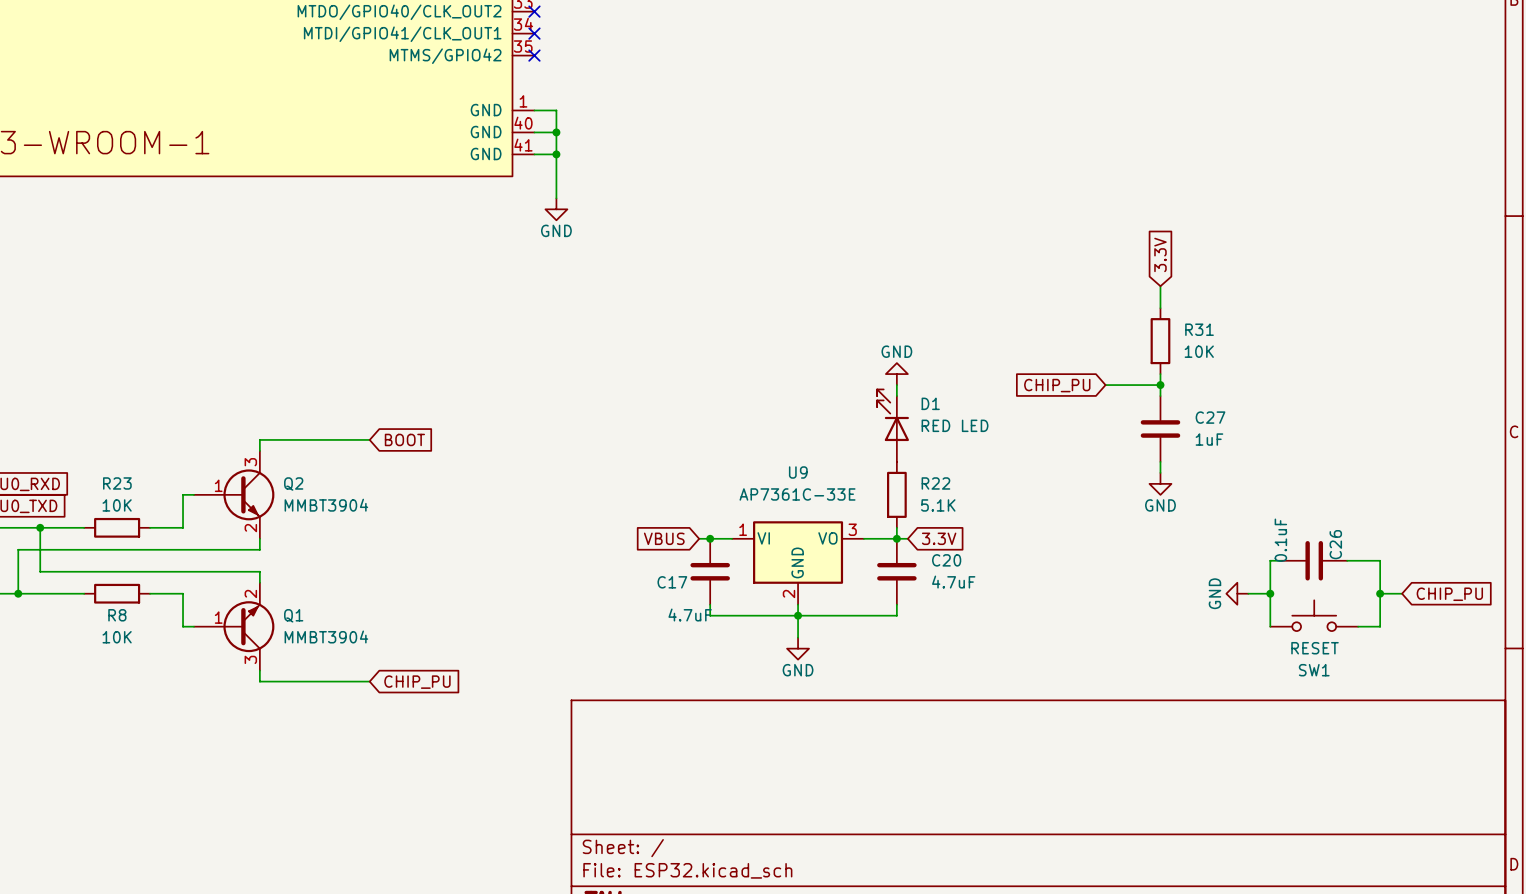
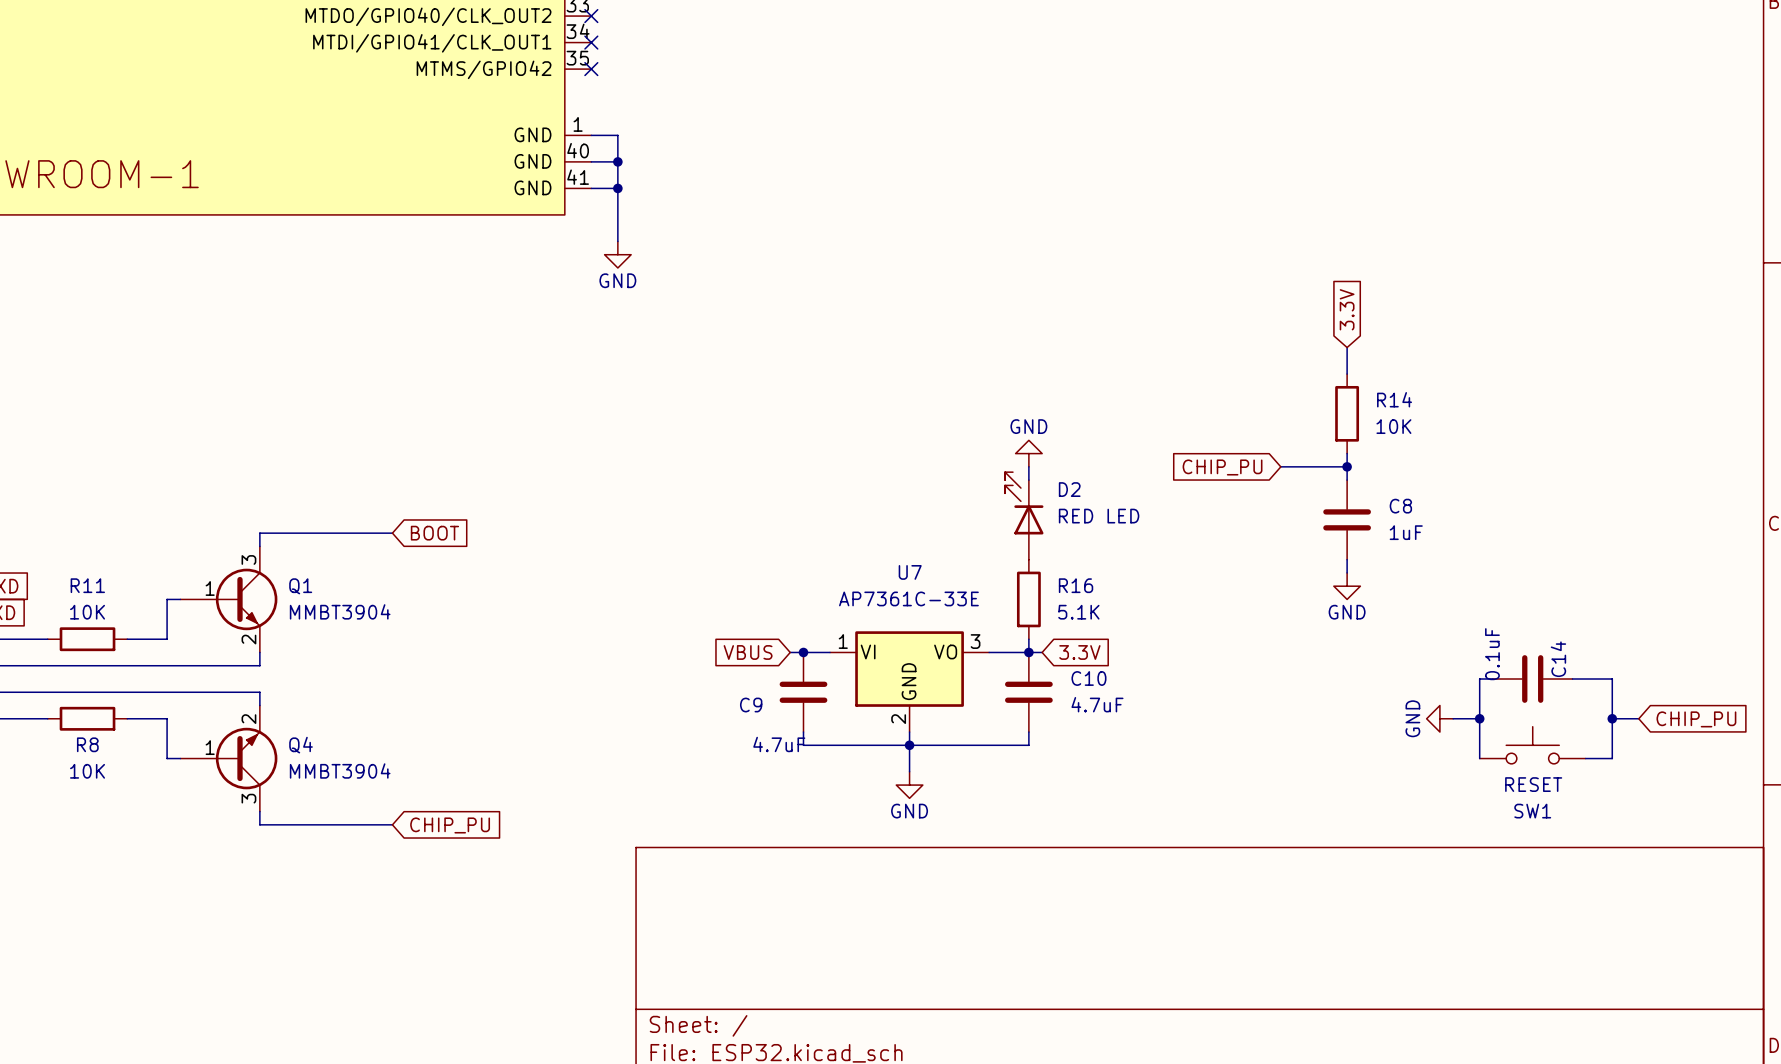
R31 name: R31 (1199, 329) -> R14 (1394, 399)
D1 name: D1 (930, 403) -> D2 (1069, 489)
C27 name: C27 (1210, 417) -> C8 (1400, 506)
U9 name: U9 (798, 472) -> U7 (910, 572)
R23 name: R23 (117, 483) -> R11 (87, 585)
R22 name: R22 (935, 483) -> R16 (1076, 585)
Q2 name: Q2 (293, 484) -> Q1 (300, 586)
C26 name: C26 (1335, 544) -> C14 (1558, 659)
C20 name: C20 (946, 560) -> C10 (1088, 678)
C17 name: C17 (672, 582) -> C9 (751, 705)
Q1 name: Q1 (293, 615) -> Q4 (301, 745)

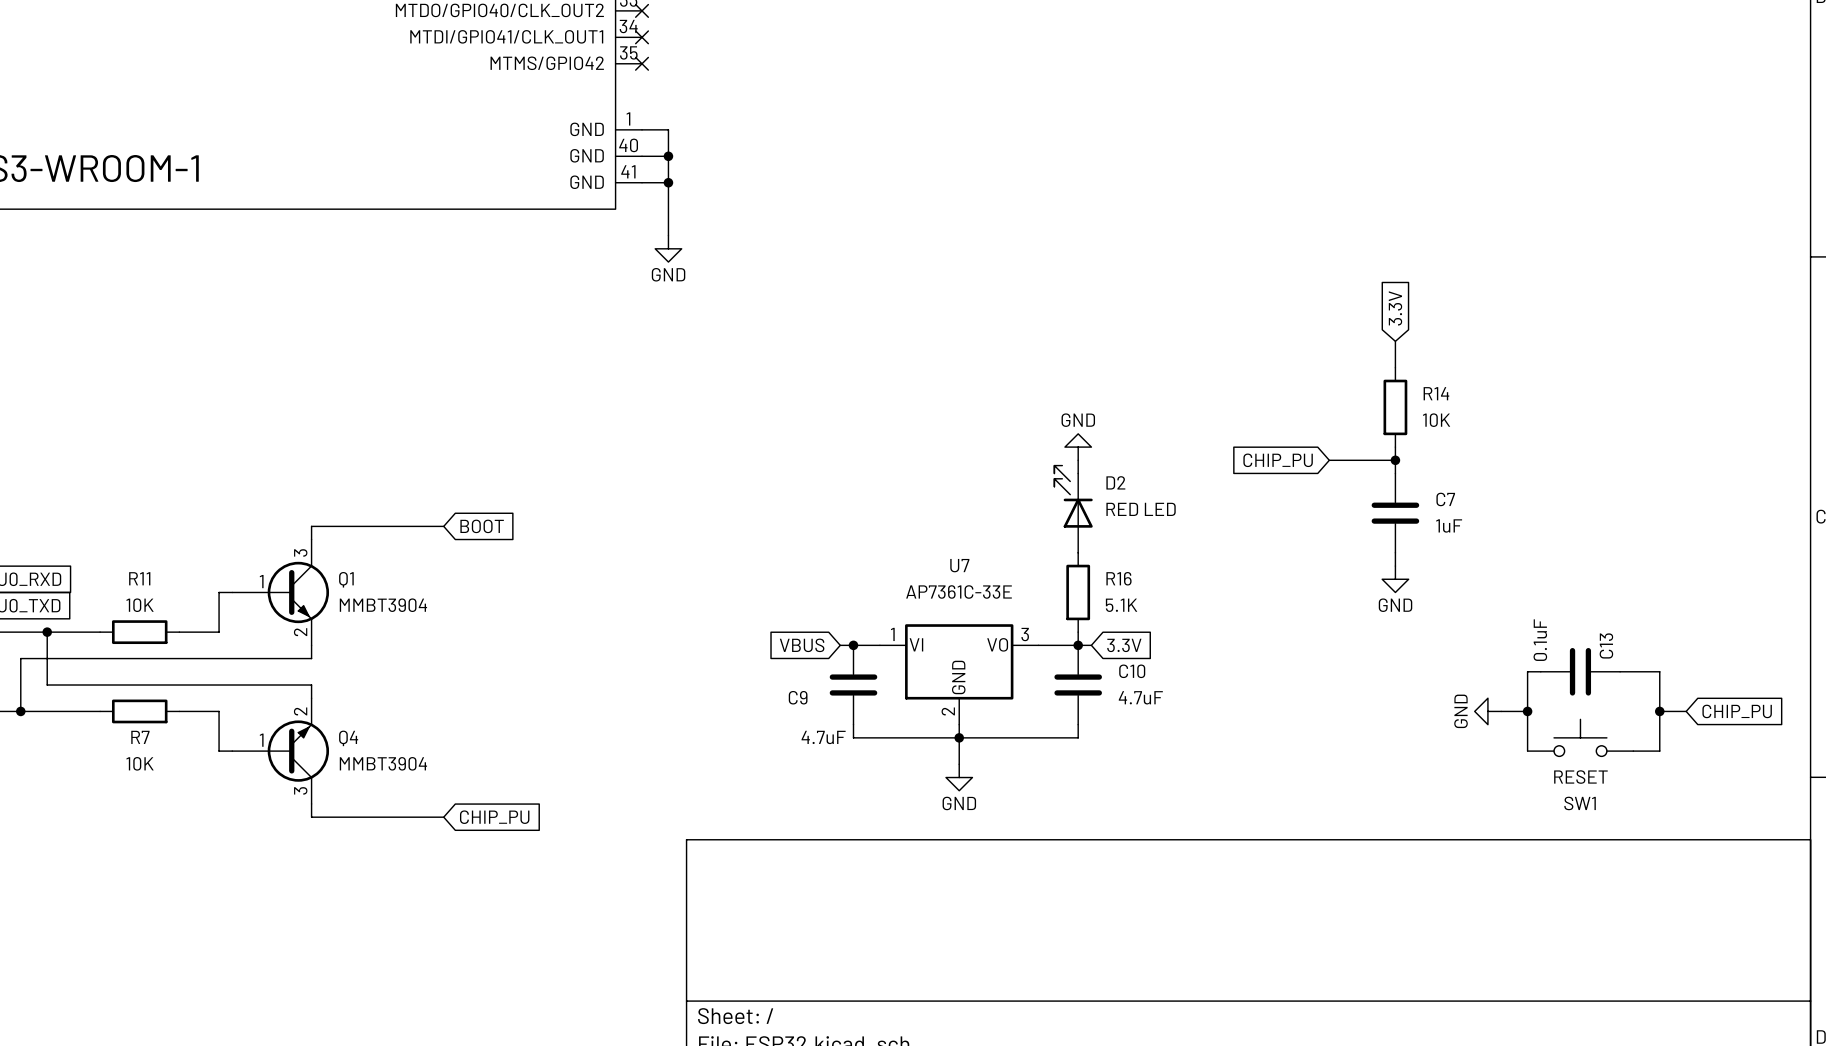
C8 name: C8 (1400, 506) -> C7 (1445, 499)
C14 name: C14 (1558, 659) -> C13 (1606, 645)
R8 name: R8 (87, 744) -> R7 (140, 737)

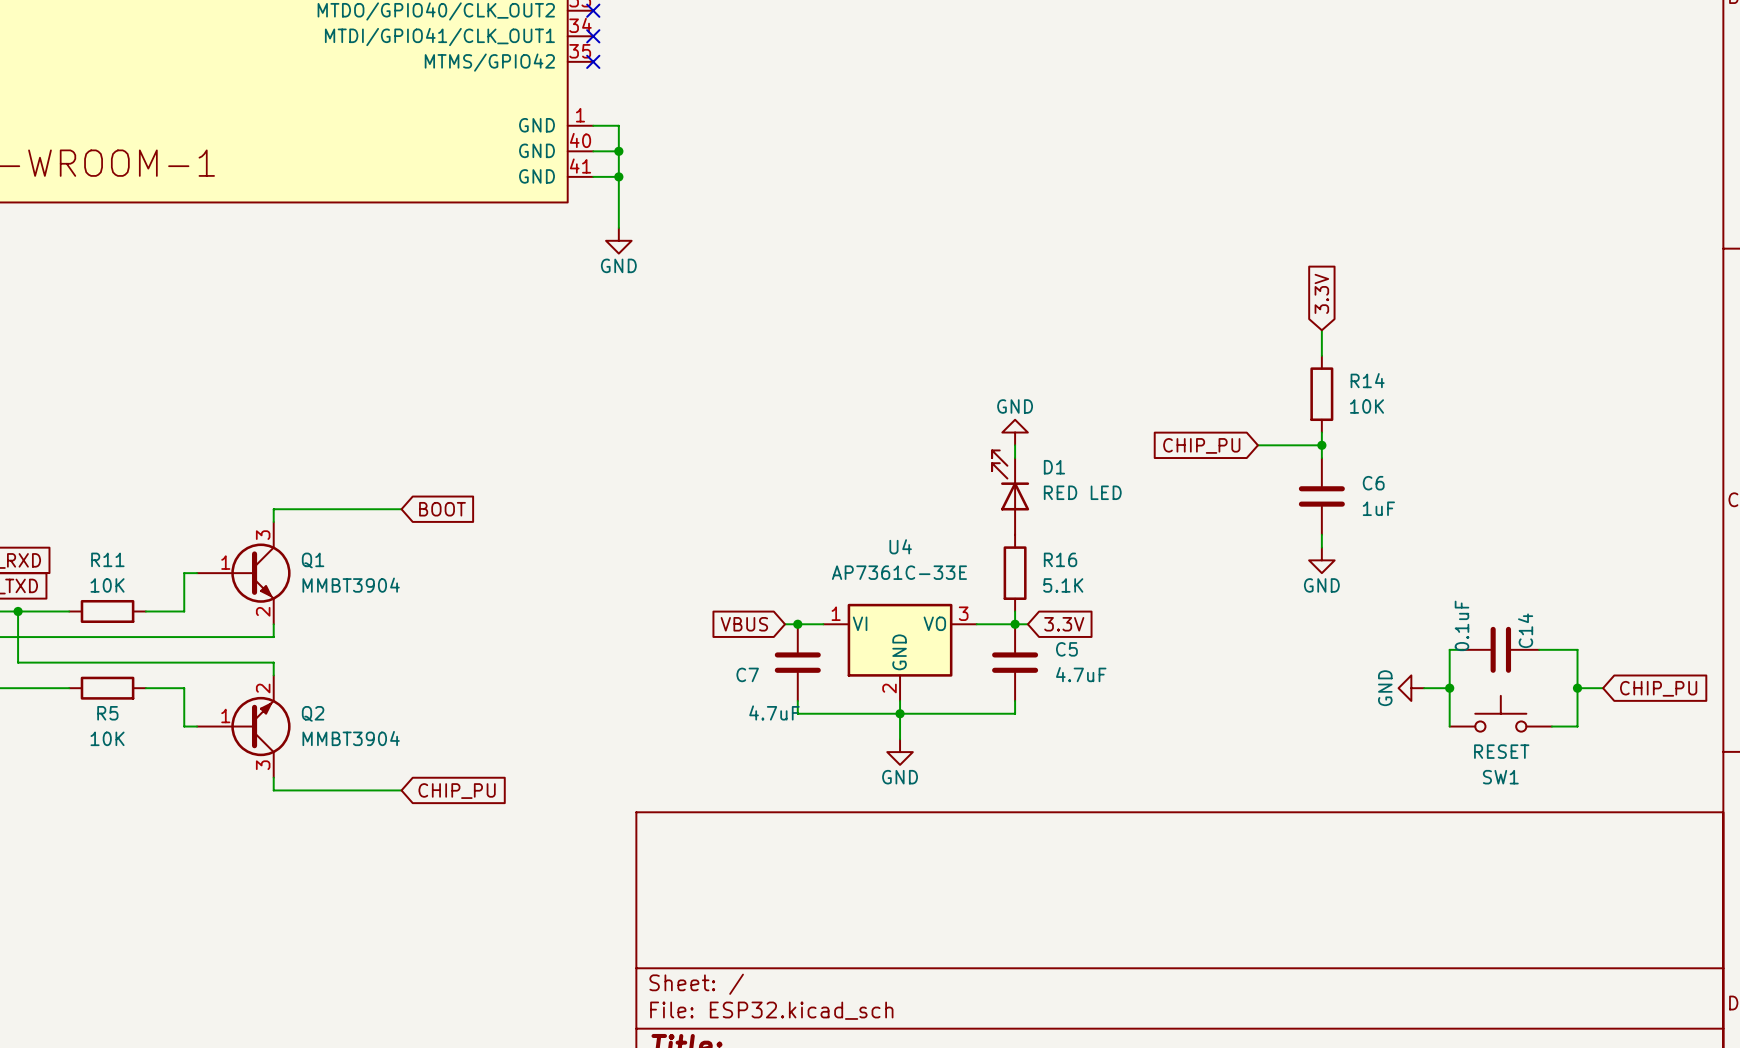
D2 name: D2 (1115, 482) -> D1 (1054, 467)
C7 name: C7 (1445, 499) -> C6 (1373, 483)
U7 name: U7 (959, 565) -> U4 (900, 546)
C13 name: C13 (1606, 645) -> C14 (1525, 630)
C10 name: C10 (1132, 671) -> C5 (1066, 649)
C9 name: C9 (798, 697) -> C7 (747, 674)
R7 name: R7 (140, 737) -> R5 (107, 713)
Q4 name: Q4 (348, 738) -> Q2 (313, 713)

